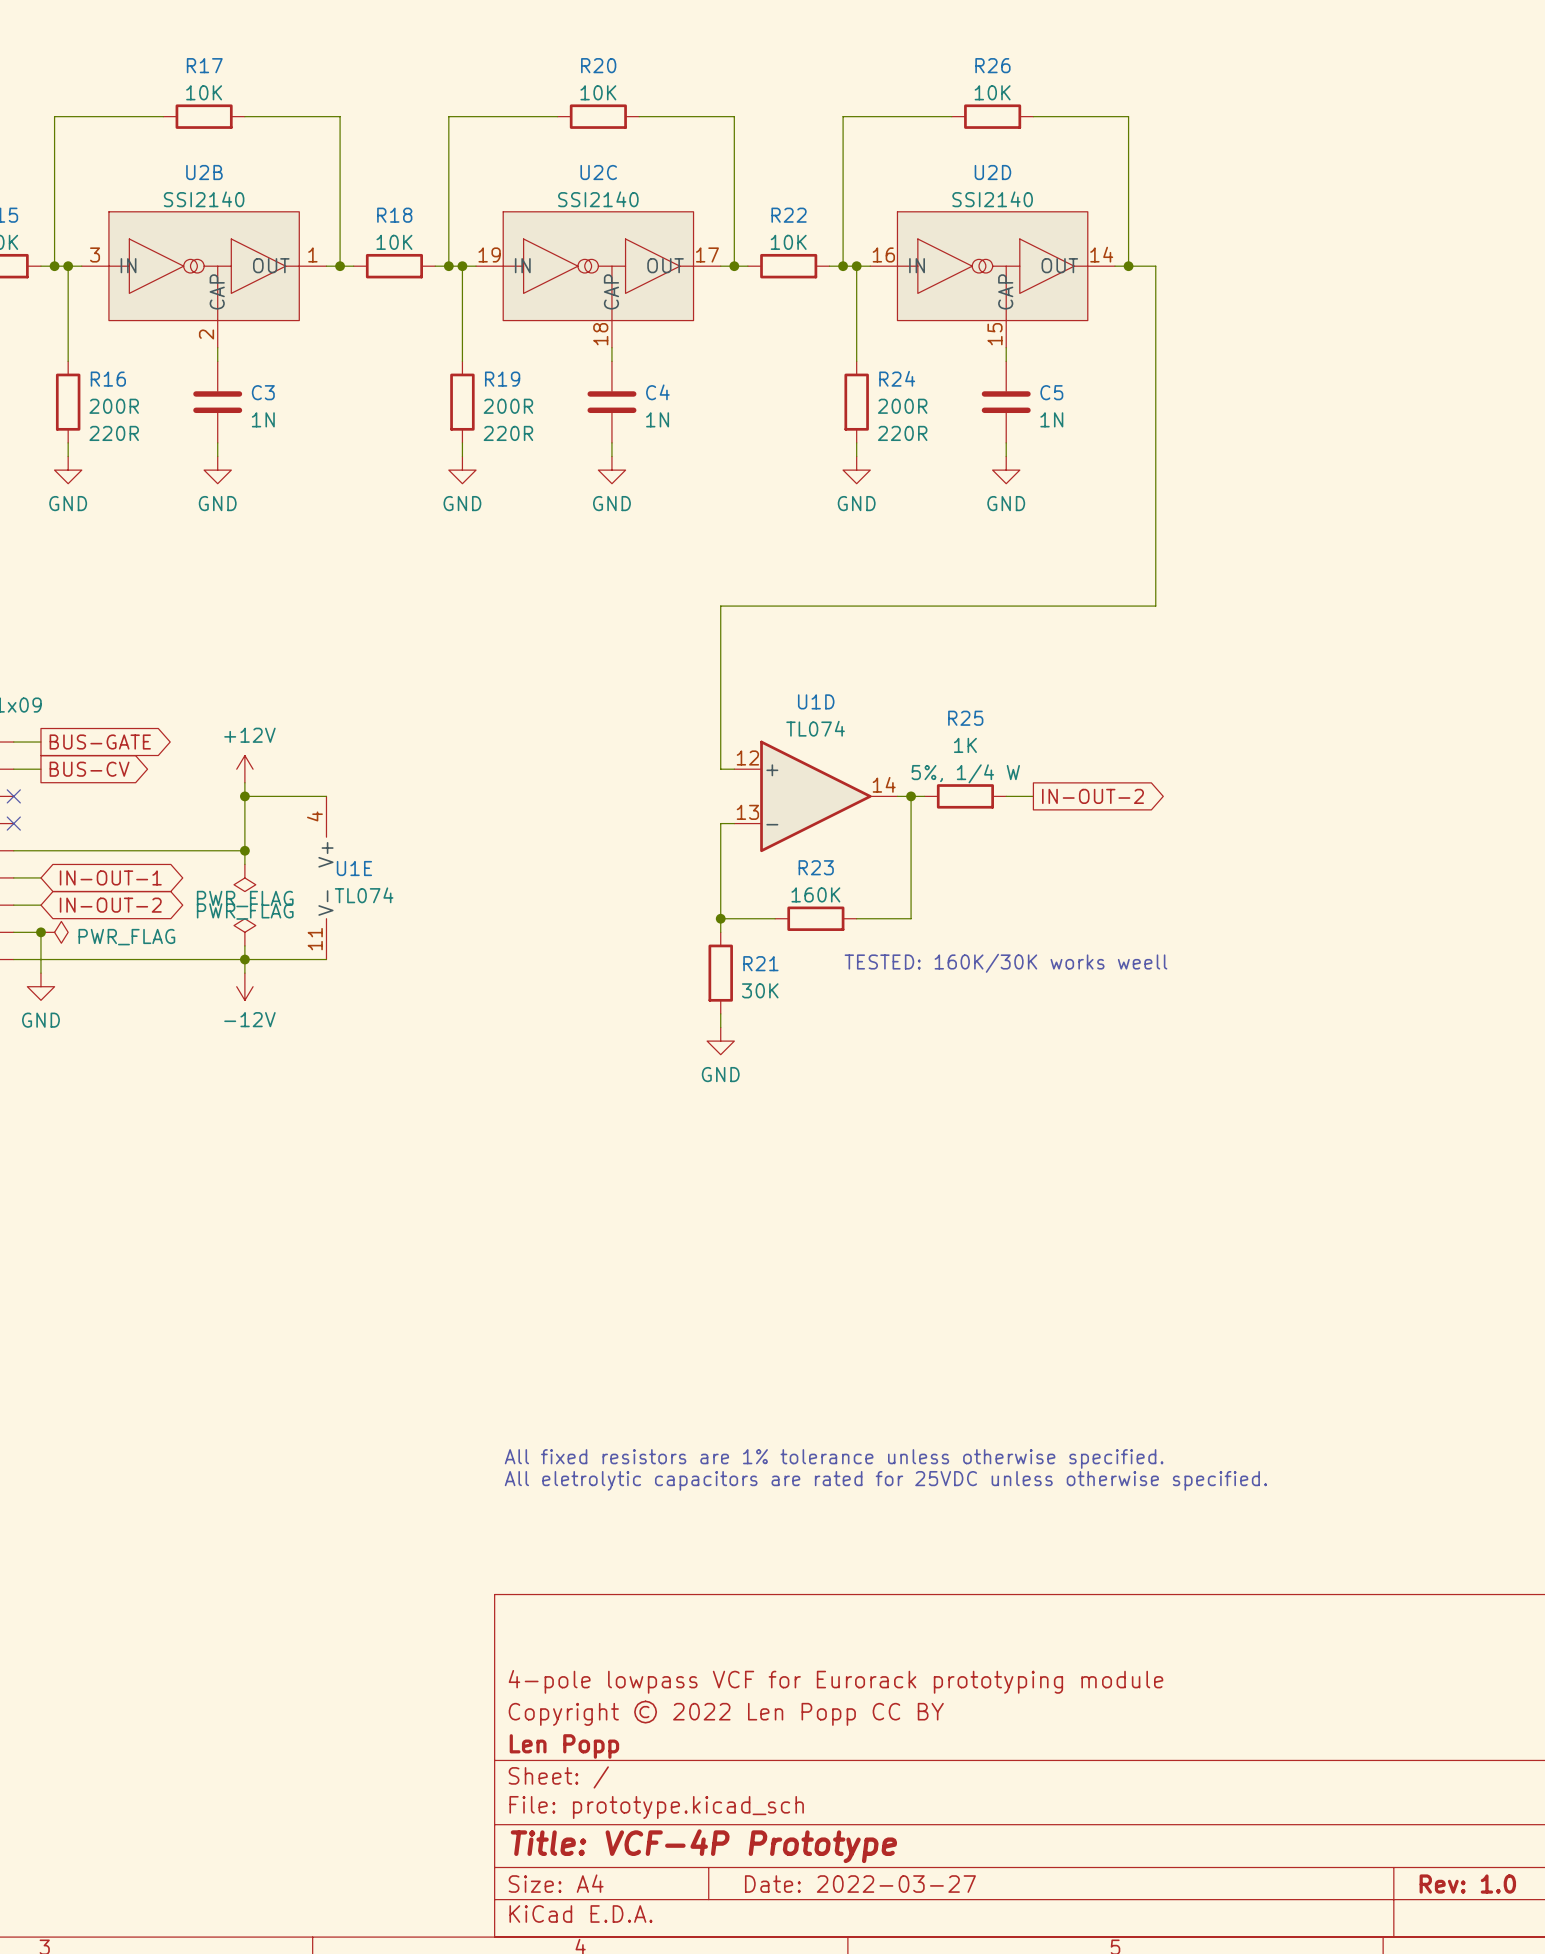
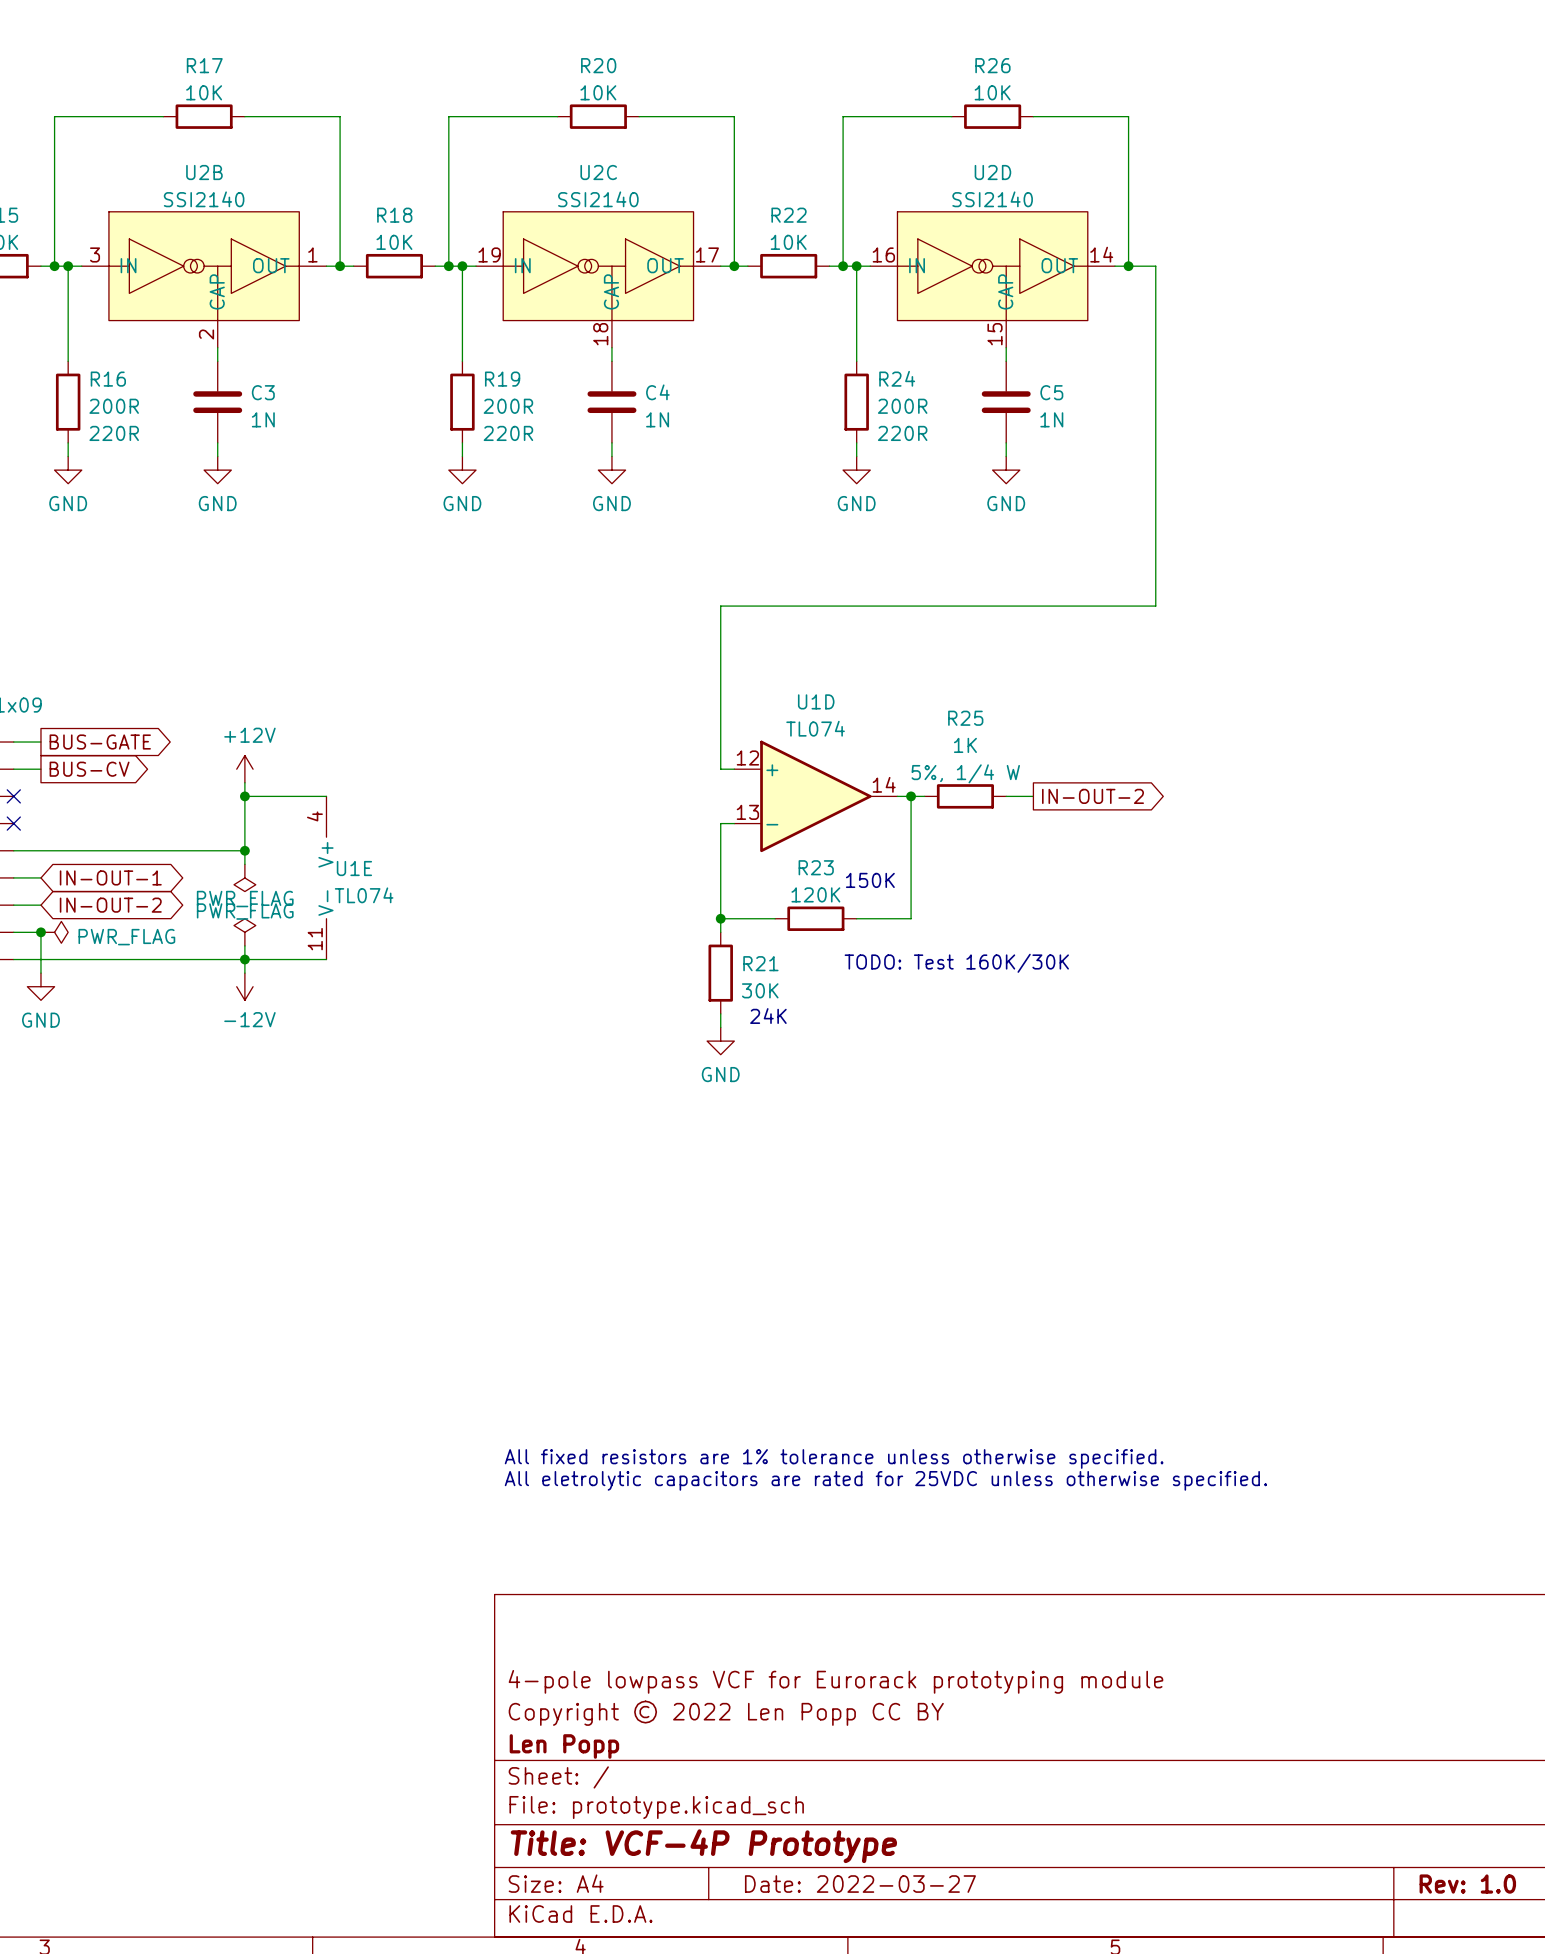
text: none -> 150K (870, 880)
R23 value: 160K (815, 894) -> 120K (815, 894)
text: TESTED: 160K/30K works weell (1006, 963) -> TODO: Test 160K/30K (956, 963)
text: none -> 24K (768, 1016)

